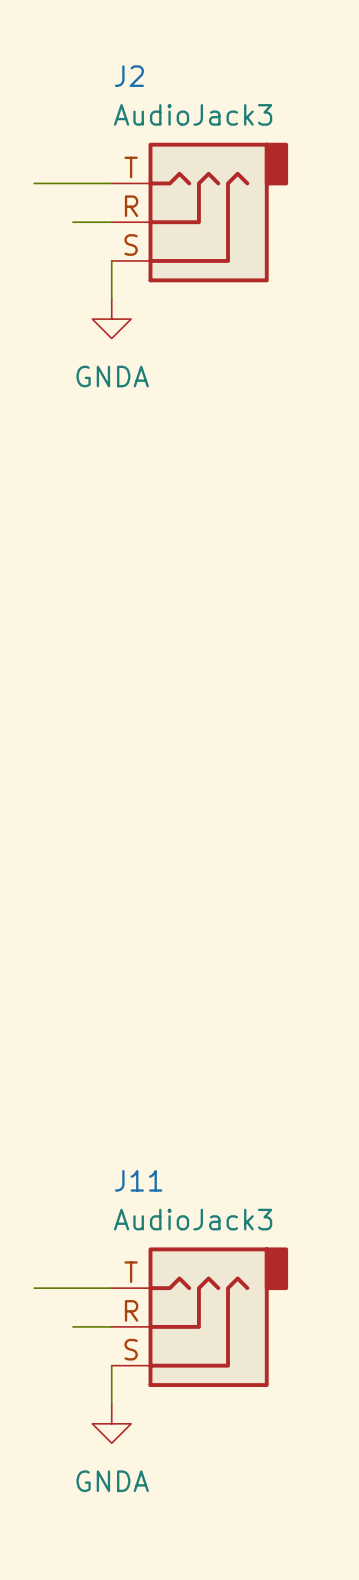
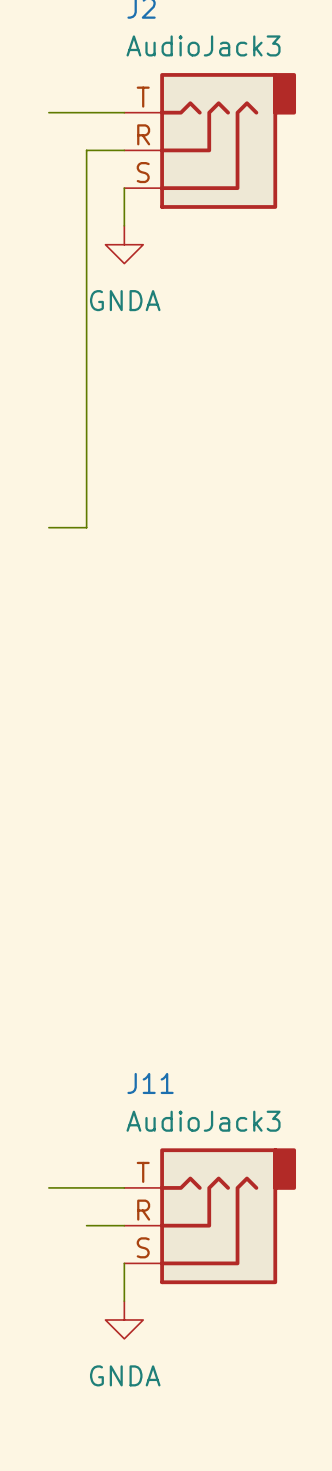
wire: none -> (86, 150) (86, 527) (48, 527)

